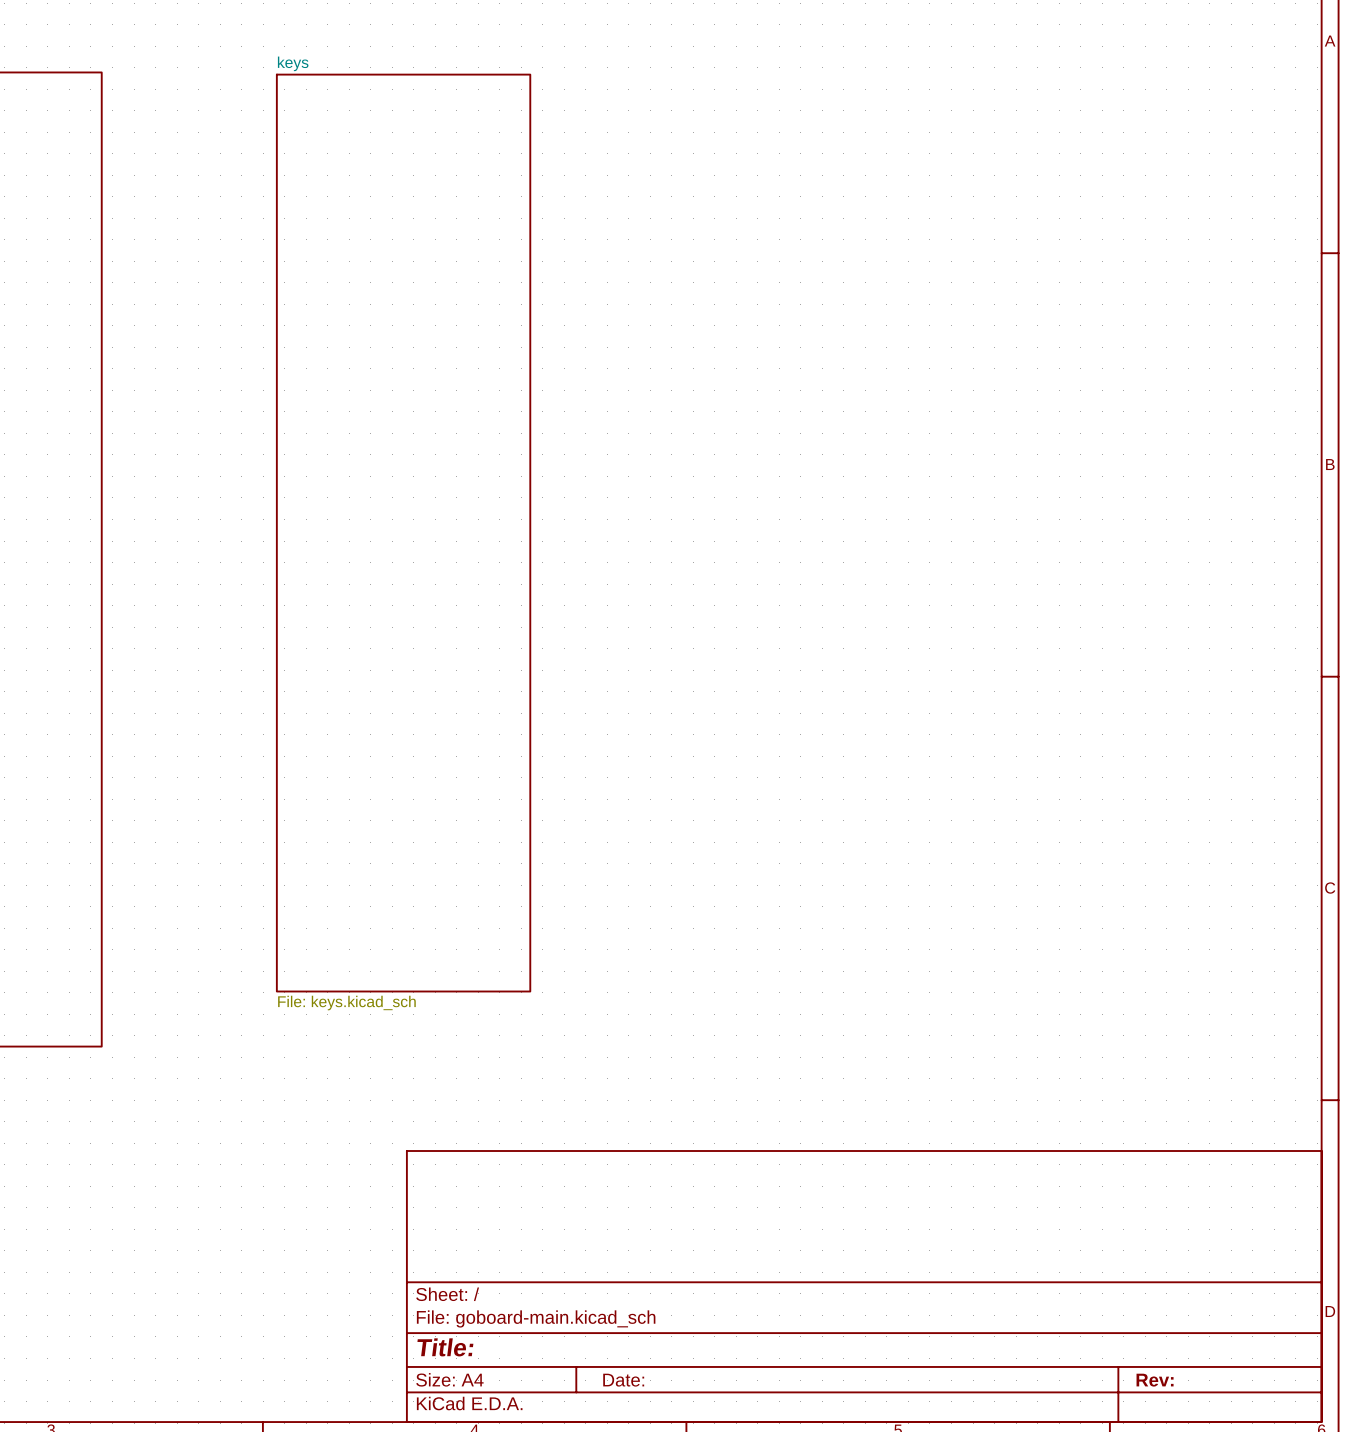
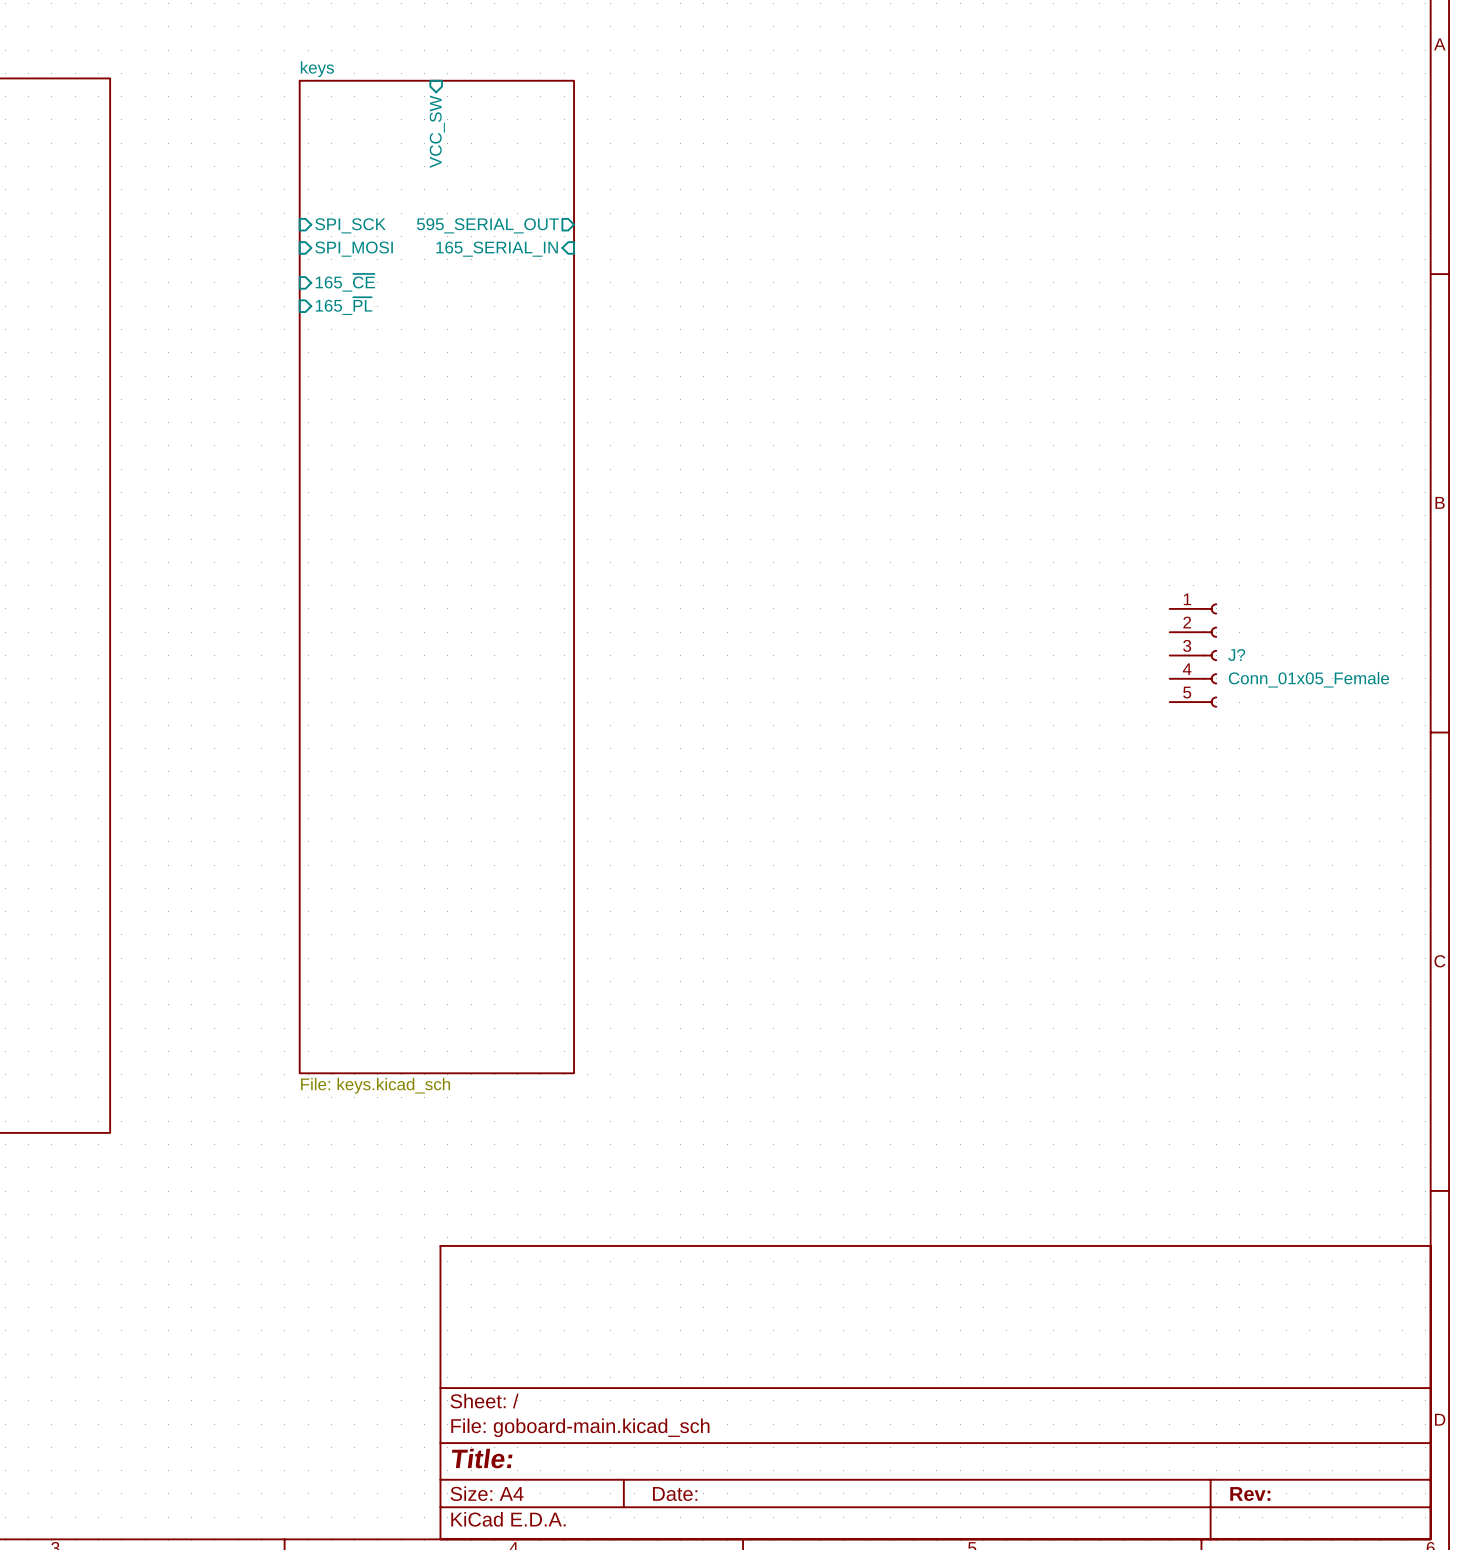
sheet pin: none -> VCC_SW (437, 131)
sheet pin: none -> SPI_SCK (350, 225)
sheet pin: none -> 595_SERIAL_OUT (487, 225)
sheet pin: none -> SPI_MOSI (354, 249)
sheet pin: none -> 165_SERIAL_IN (497, 249)
sheet pin: none -> 165_~{CE} (345, 282)
sheet pin: none -> 165_~{PL} (344, 306)
J?: none -> Conn_01x05_Female (1193, 655)

